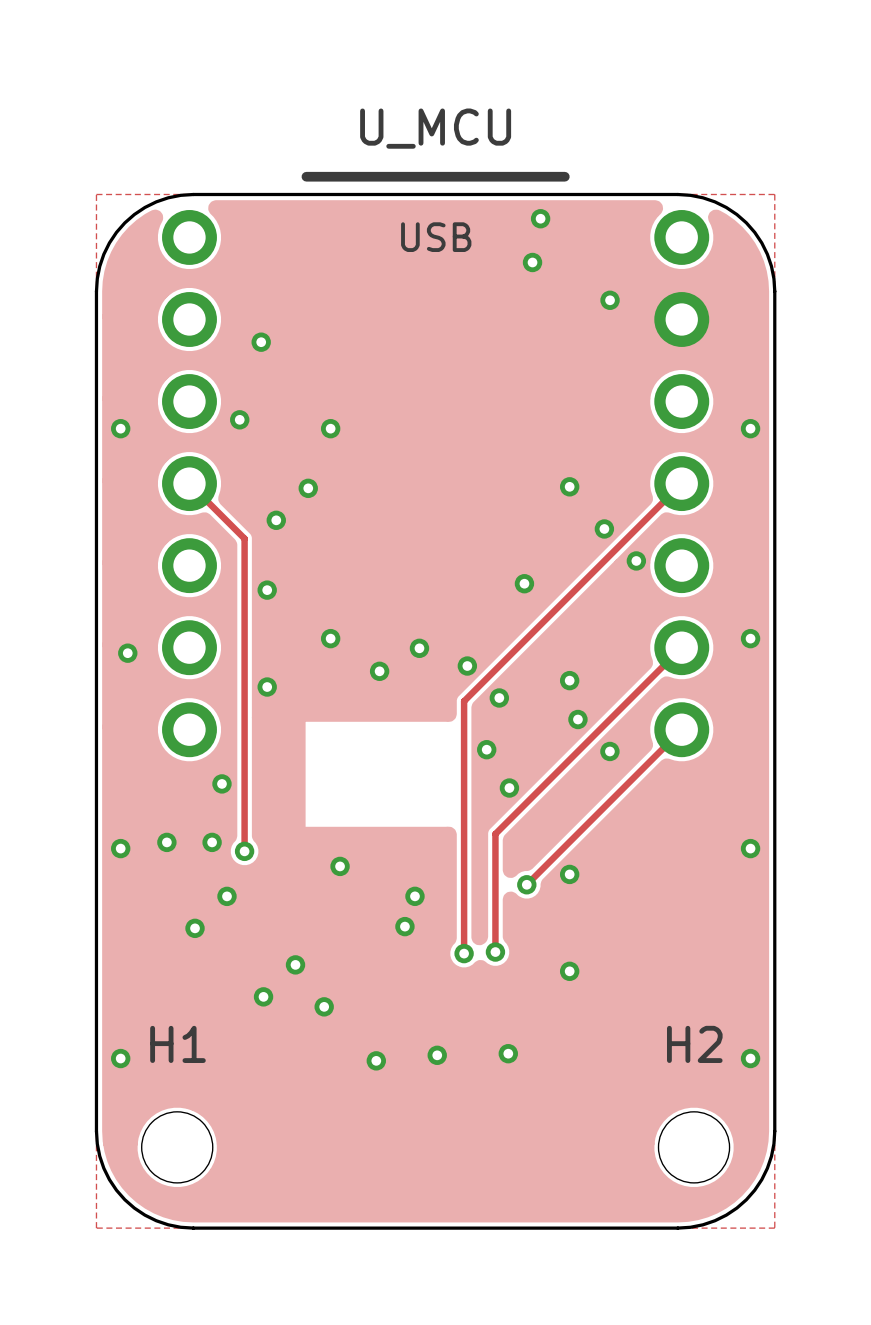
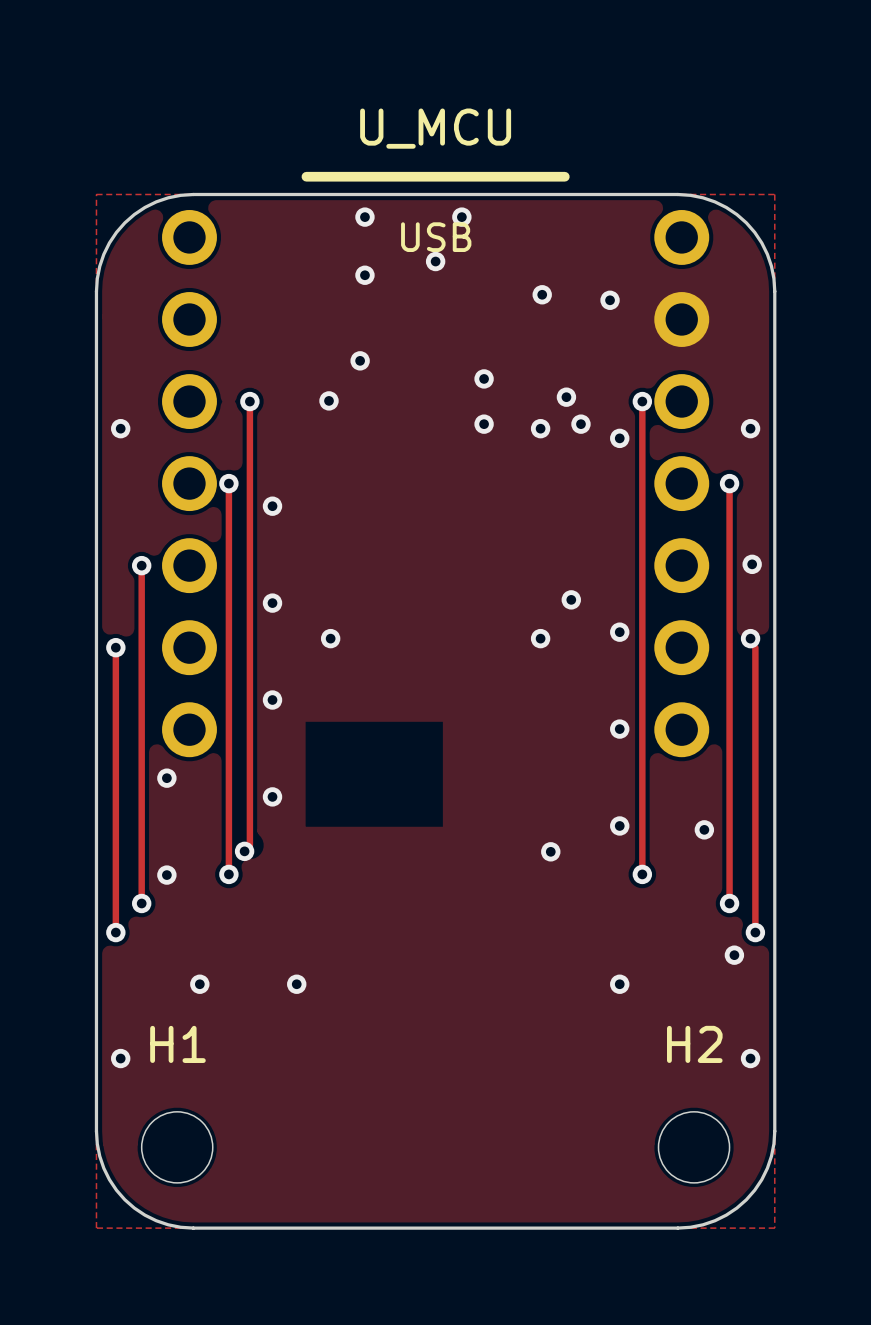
via: none -> (364, 217)
via: none -> (461, 217)
via: (540, 218) -> none
via: none -> (435, 261)
via position: (532, 262) -> (542, 294)
via: none -> (364, 275)
via: (261, 342) -> none
via: none -> (360, 360)
via: none -> (484, 378)
via: none -> (566, 397)
track: none -> (249, 401) (249, 845)
track: none -> (642, 401) (642, 874)
via: none -> (642, 401)
via position: (239, 419) -> (249, 401)
via: none -> (484, 424)
via: none -> (580, 424)
via position: (330, 428) -> (329, 400)
via: none -> (540, 428)
via: none -> (619, 438)
track: (189, 483) (244, 538) (244, 851) -> none
track: none -> (228, 483) (228, 874)
via: none -> (228, 483)
track: (681, 483) (464, 701) (464, 953) -> none
track: none -> (729, 483) (729, 903)
via: none -> (729, 483)
via: (569, 486) -> none
via: (308, 488) -> none
via position: (276, 520) -> (272, 506)
via: (604, 528) -> none
via: (636, 560) -> none
via: none -> (752, 564)
track: none -> (141, 565) (141, 903)
via: none -> (141, 565)
via: (524, 583) -> none
via position: (267, 590) -> (272, 603)
via: none -> (571, 599)
via: none -> (619, 632)
via: none -> (540, 638)
track: none -> (115, 647) (115, 932)
track: (681, 647) (495, 833) (495, 952) -> none
track: none -> (755, 647) (755, 932)
via: (419, 648) -> none
via position: (127, 653) -> (115, 647)
via: (467, 666) -> none
via: (379, 671) -> none
via: (569, 680) -> none
via position: (267, 687) -> (272, 700)
via: (499, 697) -> none
via: (577, 719) -> none
via: none -> (619, 729)
track: (681, 729) (526, 884) -> none
via: (486, 749) -> none
via: (609, 751) -> none
via: none -> (166, 778)
via: (221, 783) -> none
via: (509, 788) -> none
via: none -> (272, 796)
via: none -> (619, 825)
via: none -> (704, 829)
via: (166, 842) -> none
via: (212, 842) -> none
via: (120, 848) -> none
via: (750, 848) -> none
via: none -> (550, 851)
via: (340, 866) -> none
via: none -> (228, 874)
via: (569, 874) -> none
via: none -> (642, 874)
via: none -> (166, 875)
via: (526, 884) -> none
via: (226, 896) -> none
via: (414, 896) -> none
via: none -> (141, 903)
via: none -> (729, 903)
via: (404, 926) -> none
via: (195, 928) -> none
via: none -> (115, 932)
via: none -> (755, 932)
via: (495, 952) -> none
via: (464, 953) -> none
via: none -> (734, 955)
via position: (295, 964) -> (296, 984)
via position: (569, 971) -> (619, 984)
via: none -> (199, 984)
via: (263, 996) -> none
via: (324, 1006) -> none
via: (508, 1053) -> none
via: (437, 1055) -> none
via: (376, 1060) -> none

